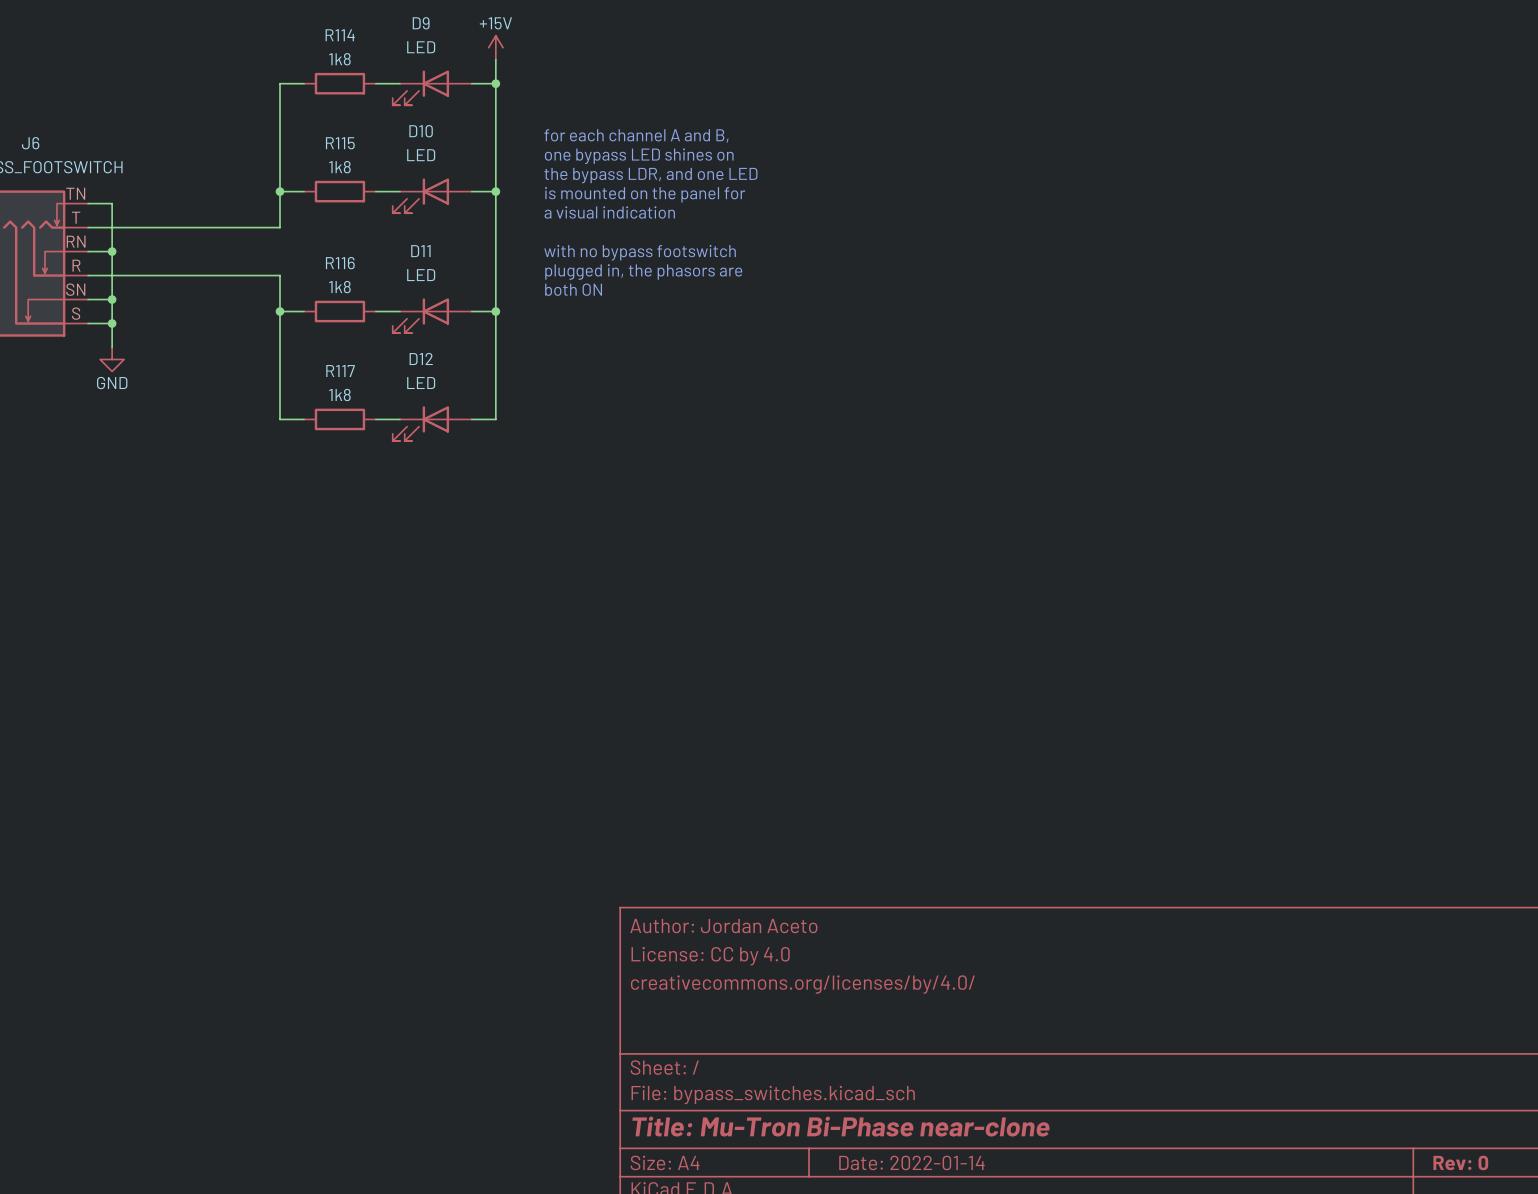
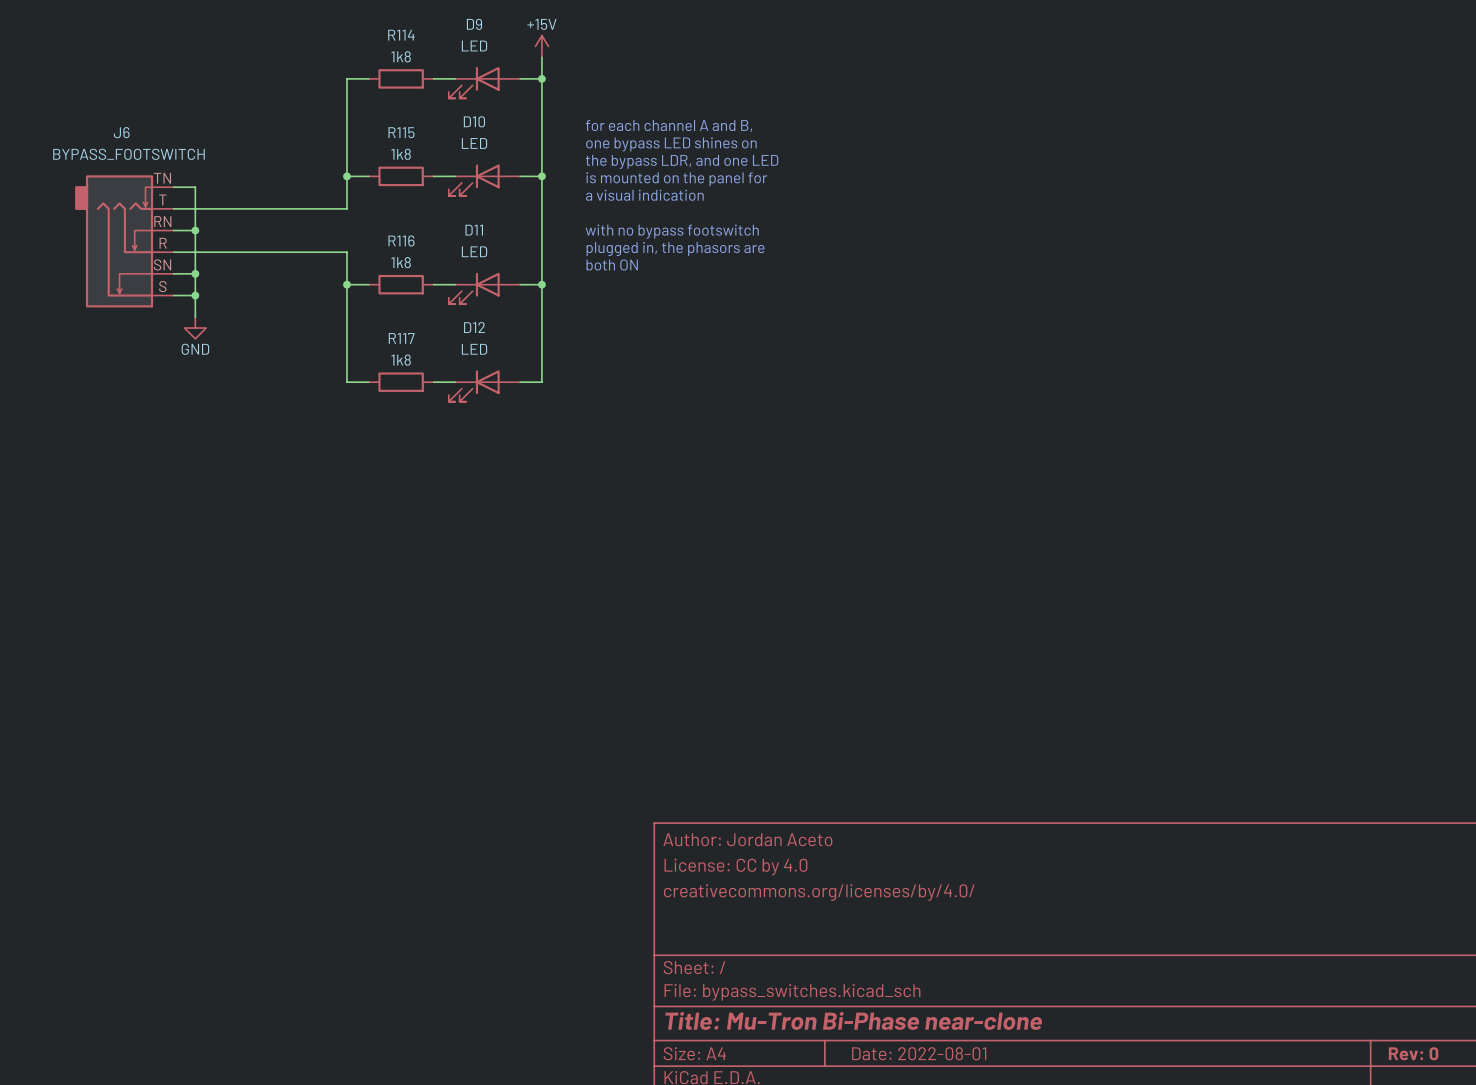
title block: Date: 2022-01-14 (911, 1162) -> Date: 2022-08-01 (919, 1053)

